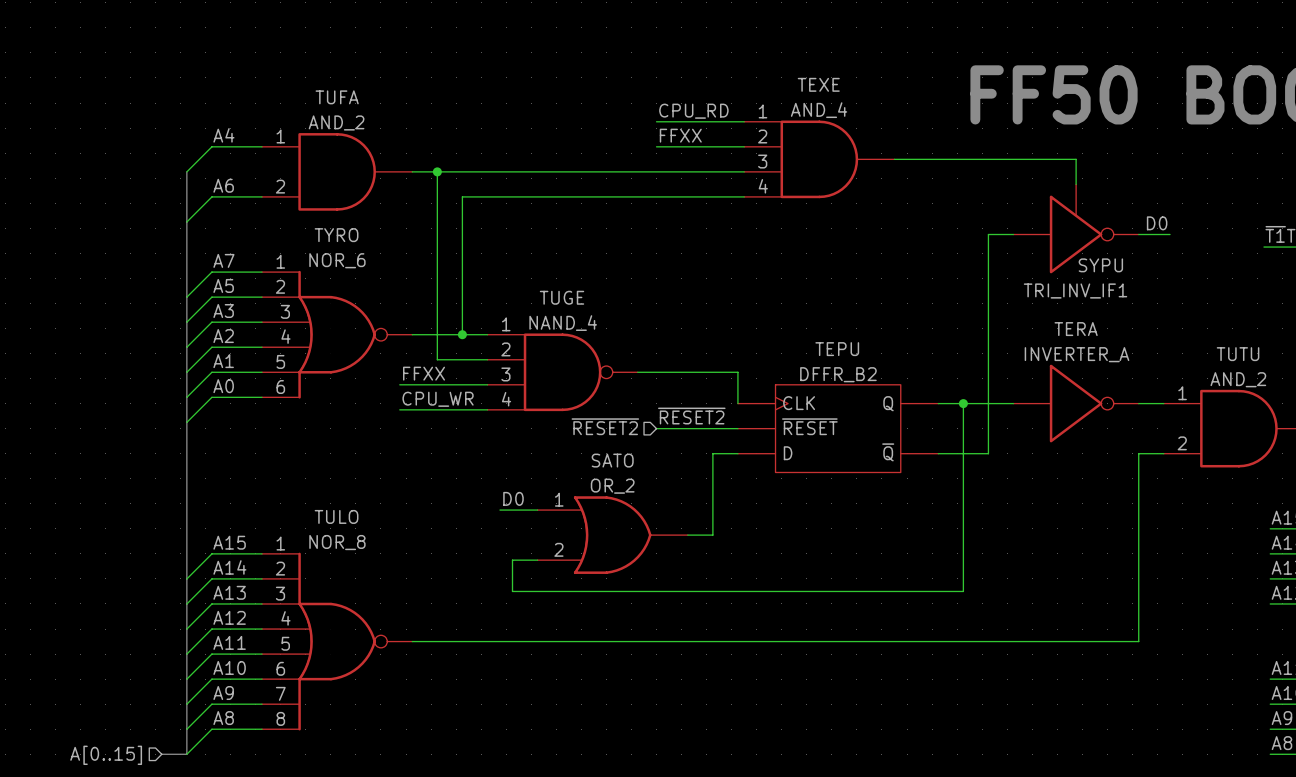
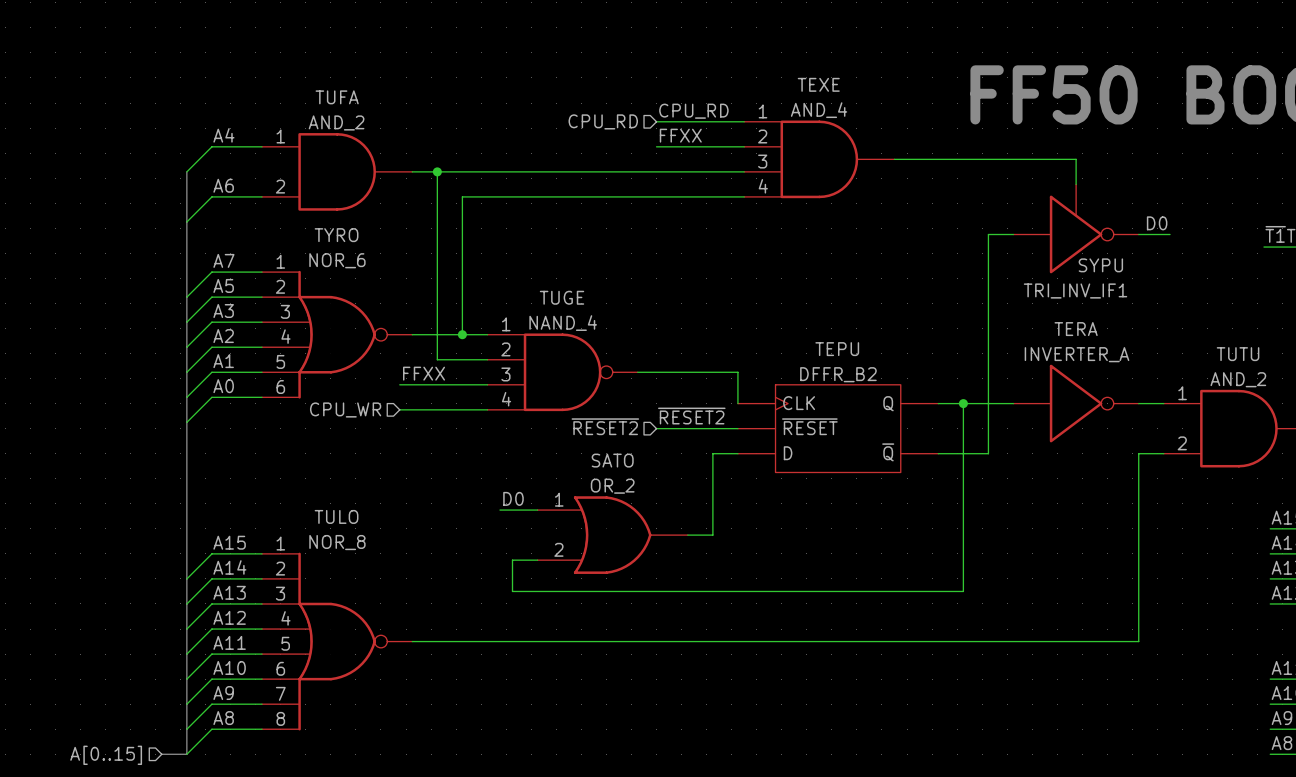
hierarchical label: none -> CPU_RD (603, 121)
label: CPU_WR (438, 399) -> none
hierarchical label: none -> CPU_WR (345, 409)

